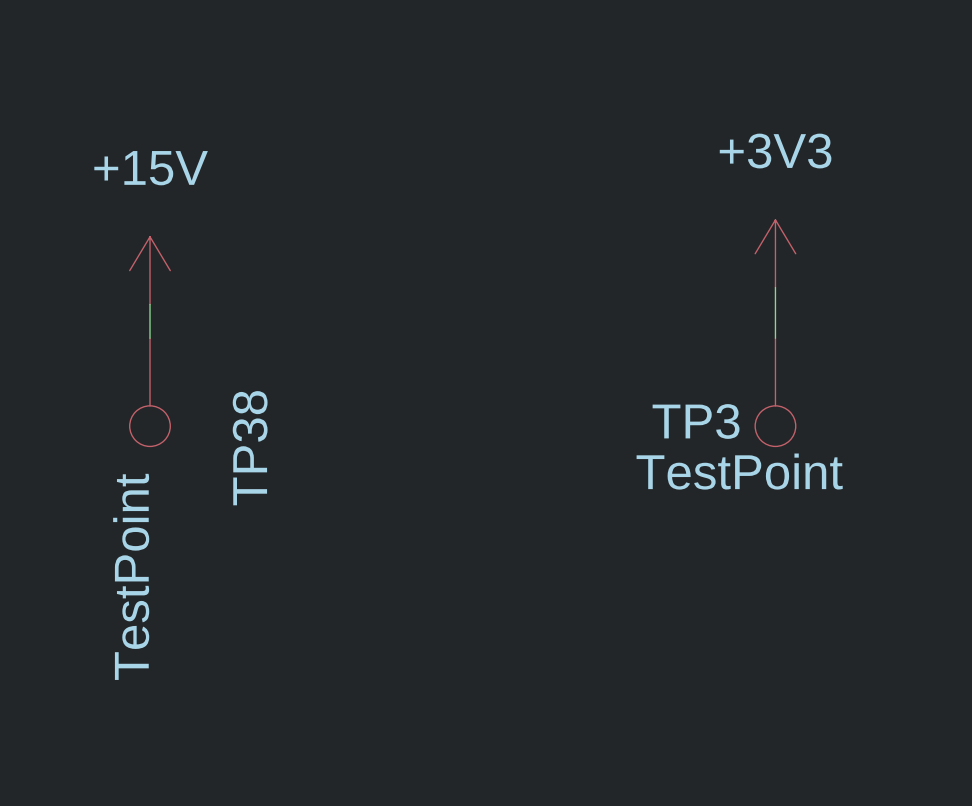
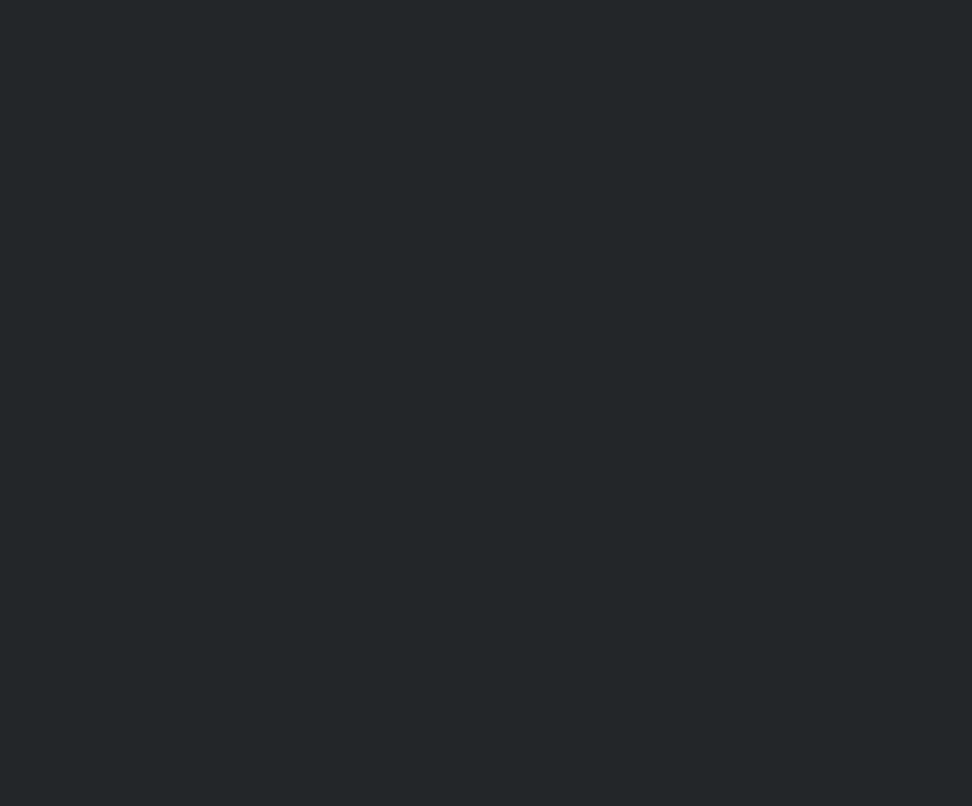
power symbol: +3V3 (775, 253) -> none
power symbol: +15V (150, 270) -> none
wire: (775, 287) (775, 338) -> none
wire: (150, 304) (150, 338) -> none
TP38: TestPoint (150, 392) -> none
TP3: TestPoint (775, 392) -> none

